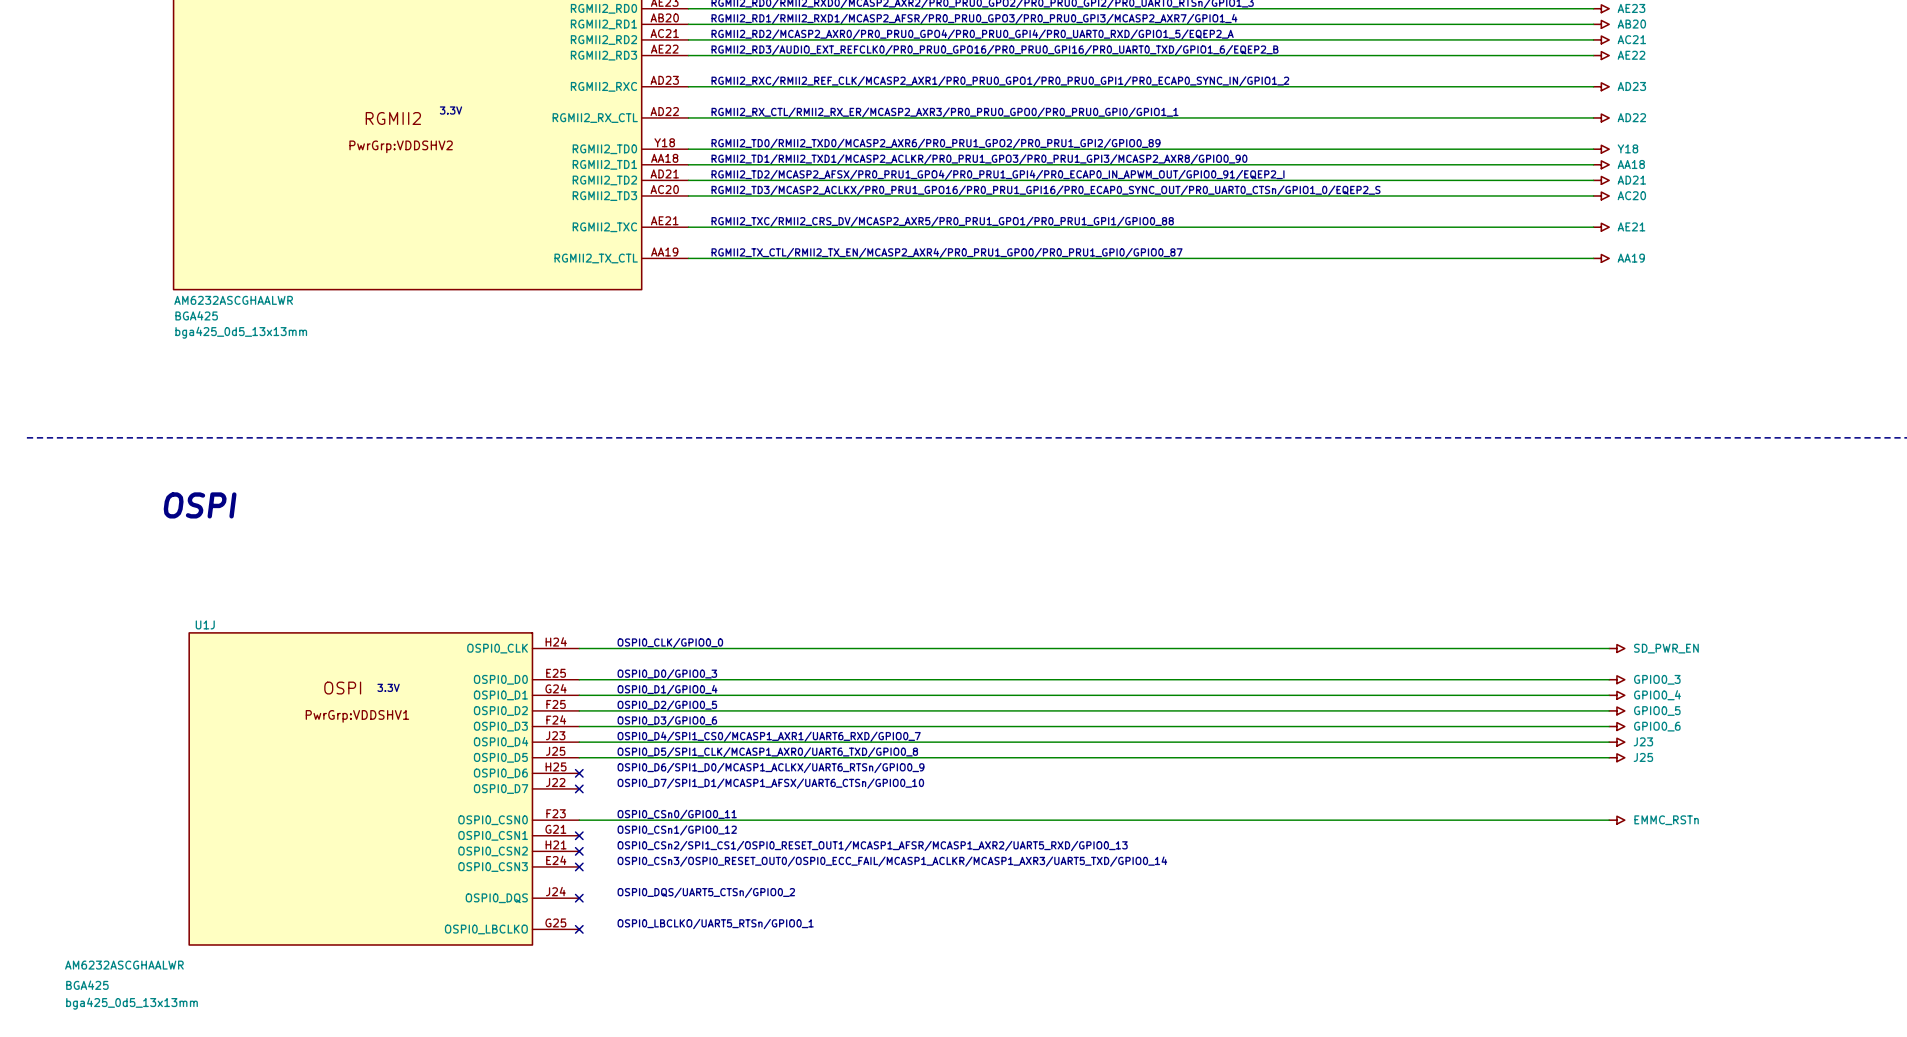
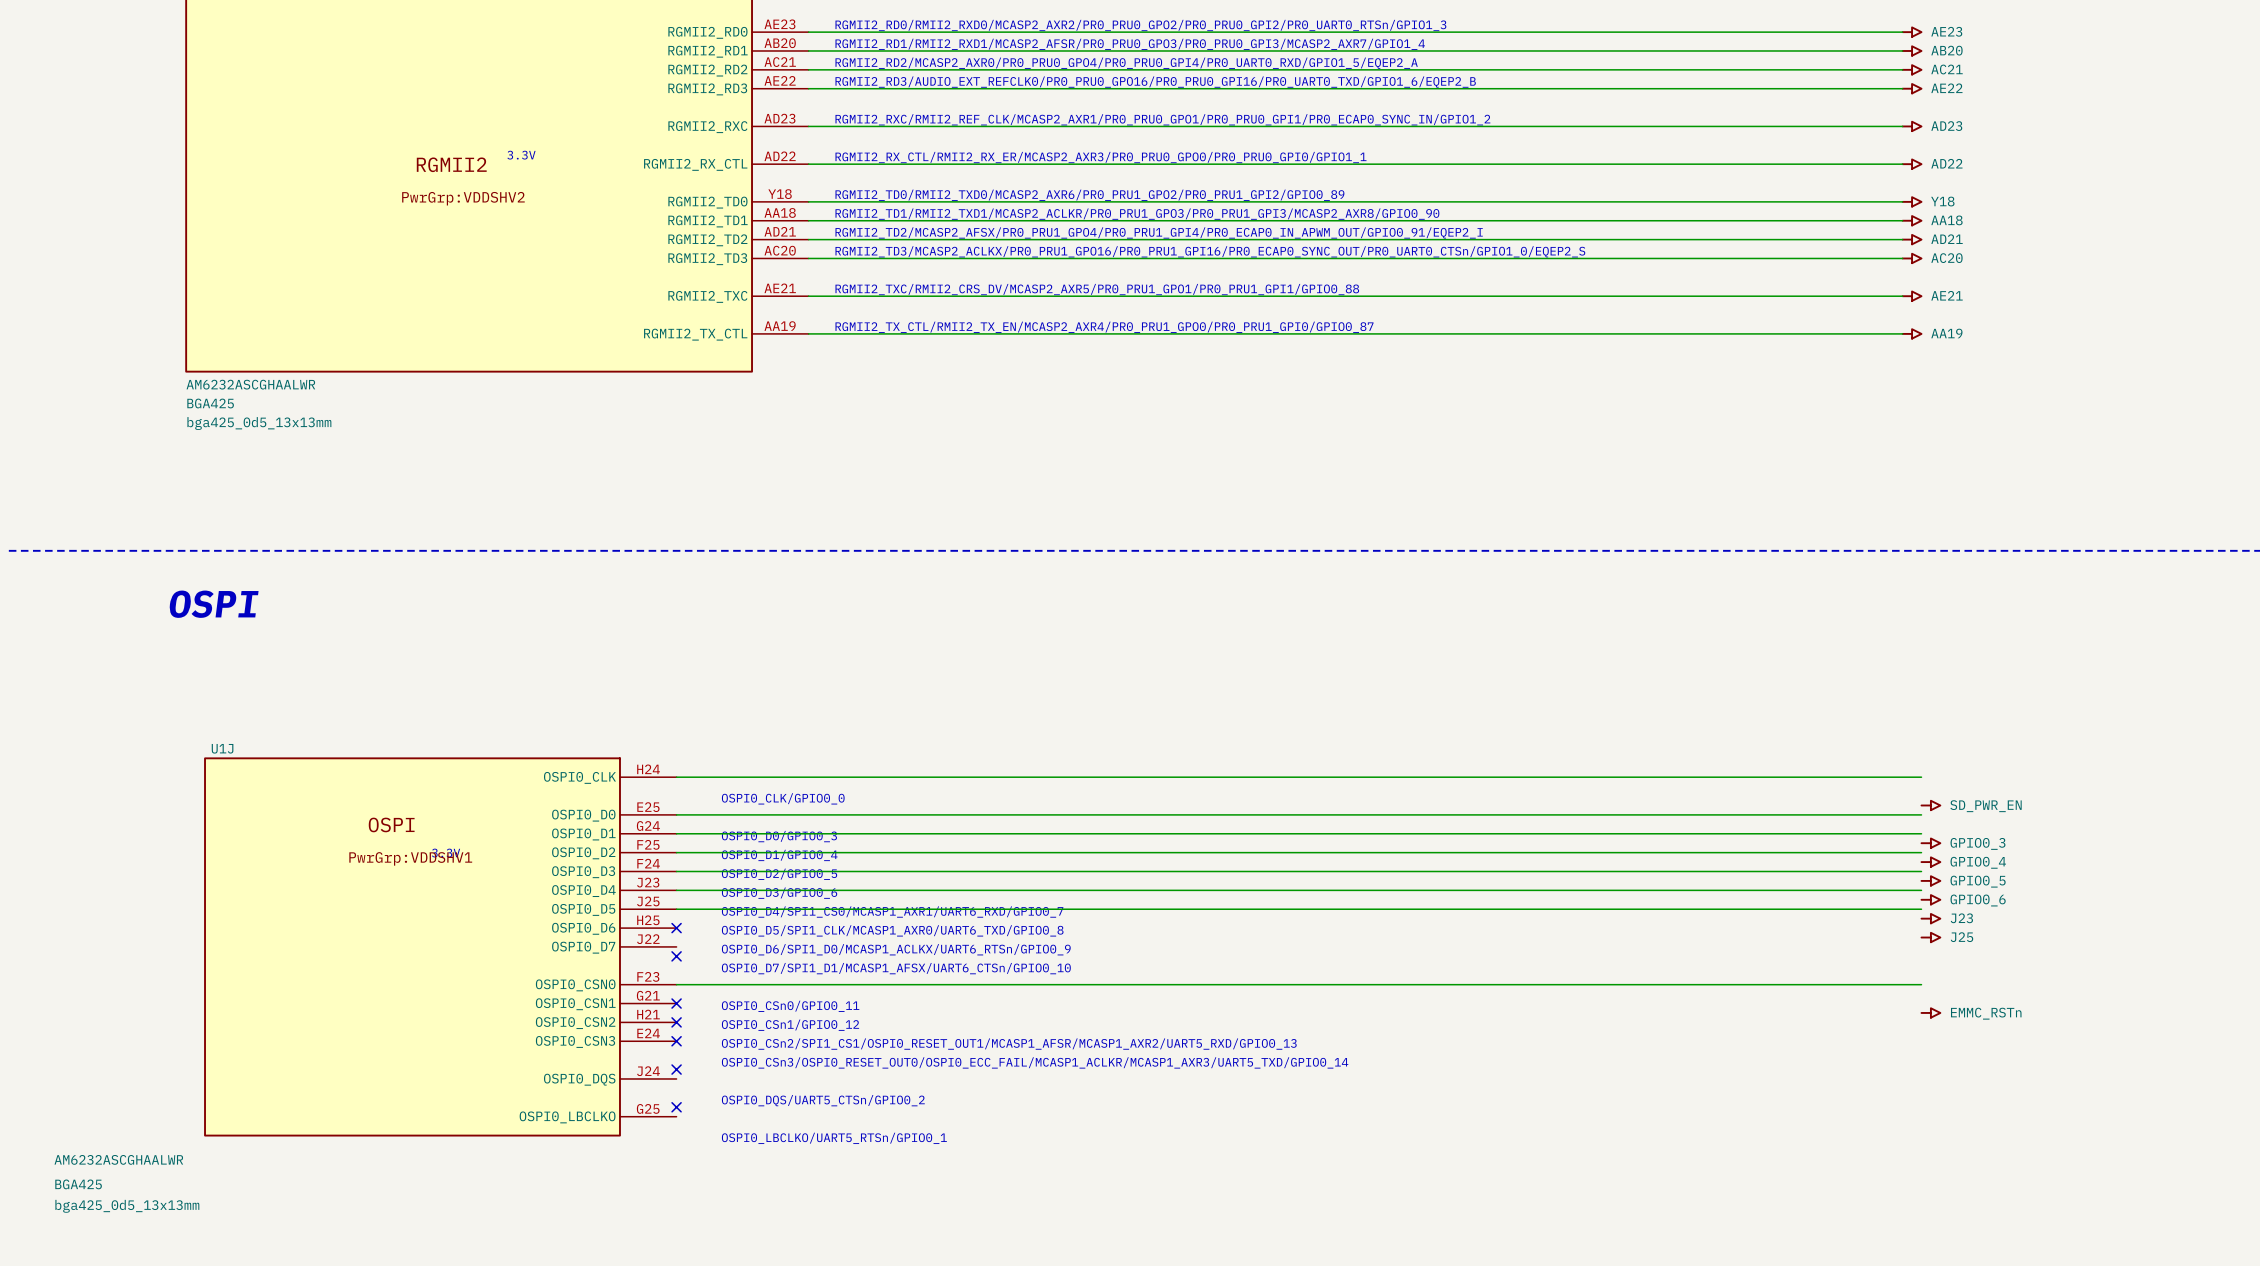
text position: OSPI (200, 505) -> OSPI (213, 604)
wire: (579, 648) (1609, 648) -> (676, 777) (1921, 777)
wire: (579, 679) (1609, 679) -> (676, 814) (1921, 814)
wire: (579, 695) (1609, 695) -> (676, 833) (1921, 833)
wire: (579, 710) (1609, 710) -> (676, 852) (1921, 852)
wire: (579, 726) (1609, 726) -> (676, 871) (1921, 871)
wire: (579, 742) (1609, 742) -> (676, 890) (1921, 890)
no-connect mark: none -> (676, 928)
wire: (579, 757) (1609, 757) -> (676, 909) (1921, 909)
U1J position: (383, 788) -> (440, 946)
no-connect mark: (579, 788) -> none
no-connect mark: none -> (676, 1003)
wire: (579, 820) (1609, 820) -> (676, 984) (1921, 984)
no-connect mark: none -> (676, 1022)
no-connect mark: (579, 835) -> none
no-connect mark: none -> (676, 1041)
no-connect mark: (579, 851) -> none
no-connect mark: (579, 929) -> none

